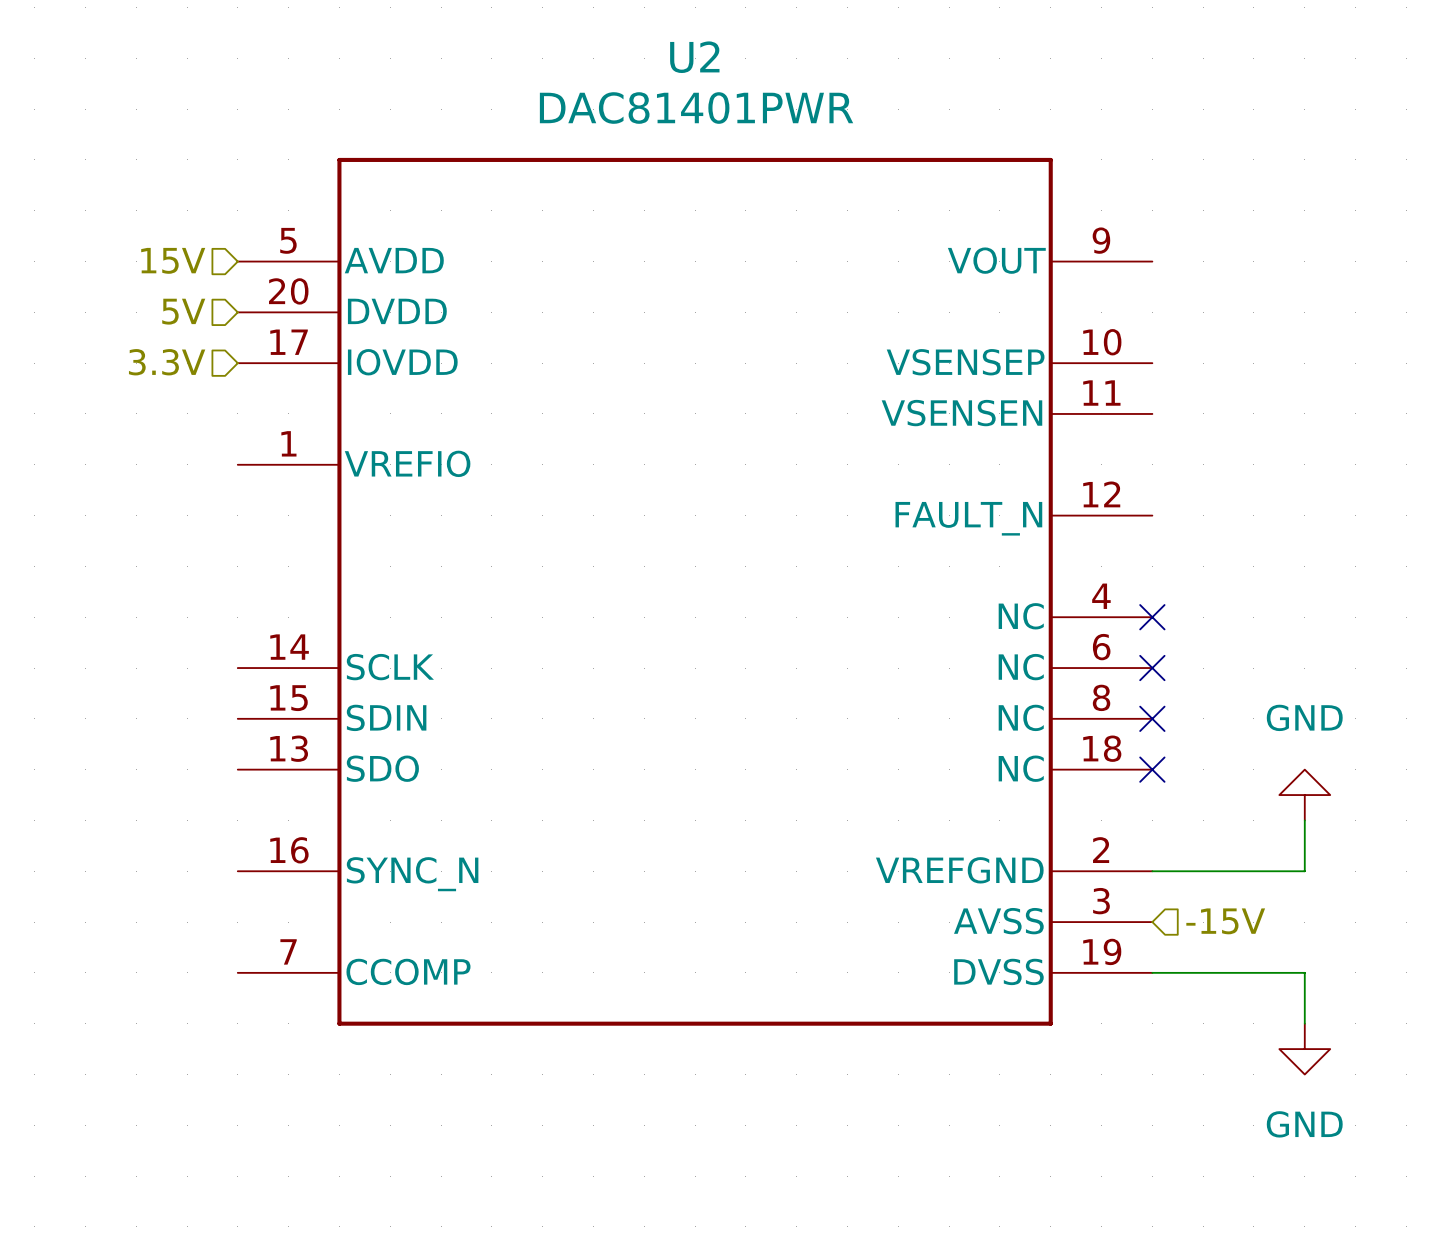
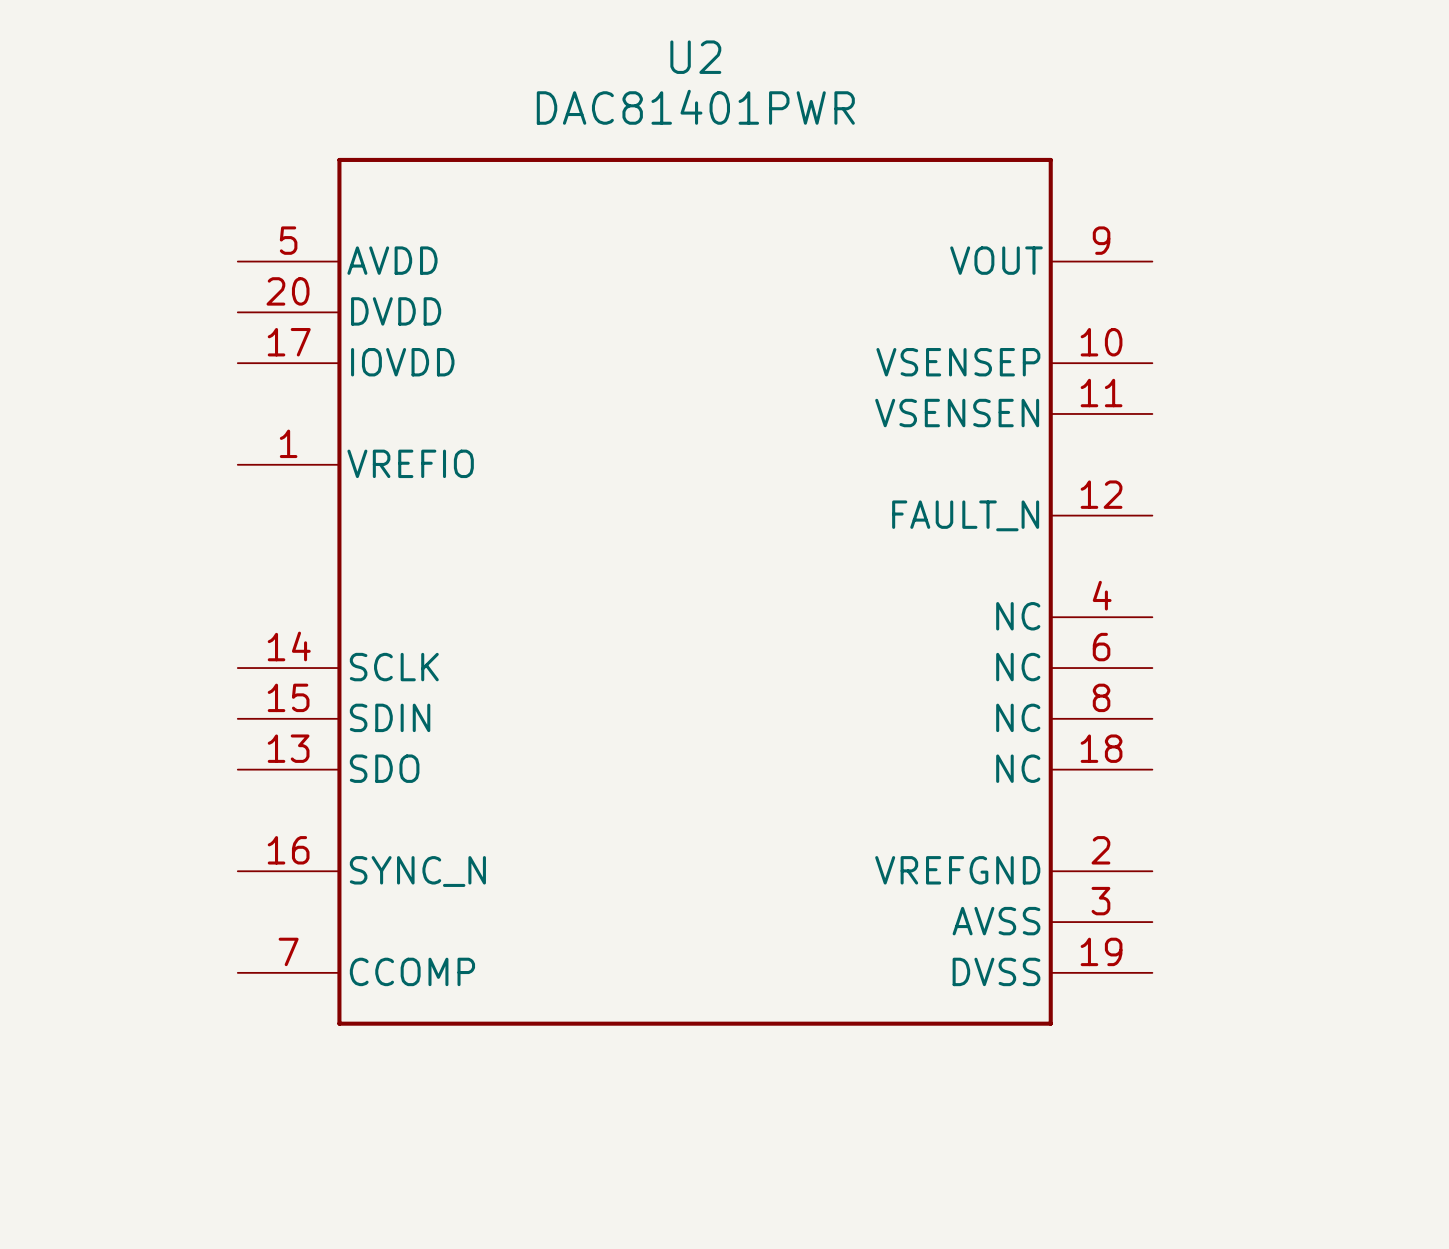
hierarchical label: 15V (173, 260) -> none
hierarchical label: 5V (183, 311) -> none
hierarchical label: 3.3V (167, 362) -> none
no-connect mark: (1152, 617) -> none
no-connect mark: (1152, 668) -> none
no-connect mark: (1152, 718) -> none
no-connect mark: (1152, 769) -> none
power symbol: GND (1304, 795) -> none
wire: (1304, 820) (1304, 871) (1152, 871) -> none
hierarchical label: -15V (1225, 921) -> none
wire: (1152, 972) (1304, 972) (1304, 1023) -> none
power symbol: GND (1304, 1049) -> none

